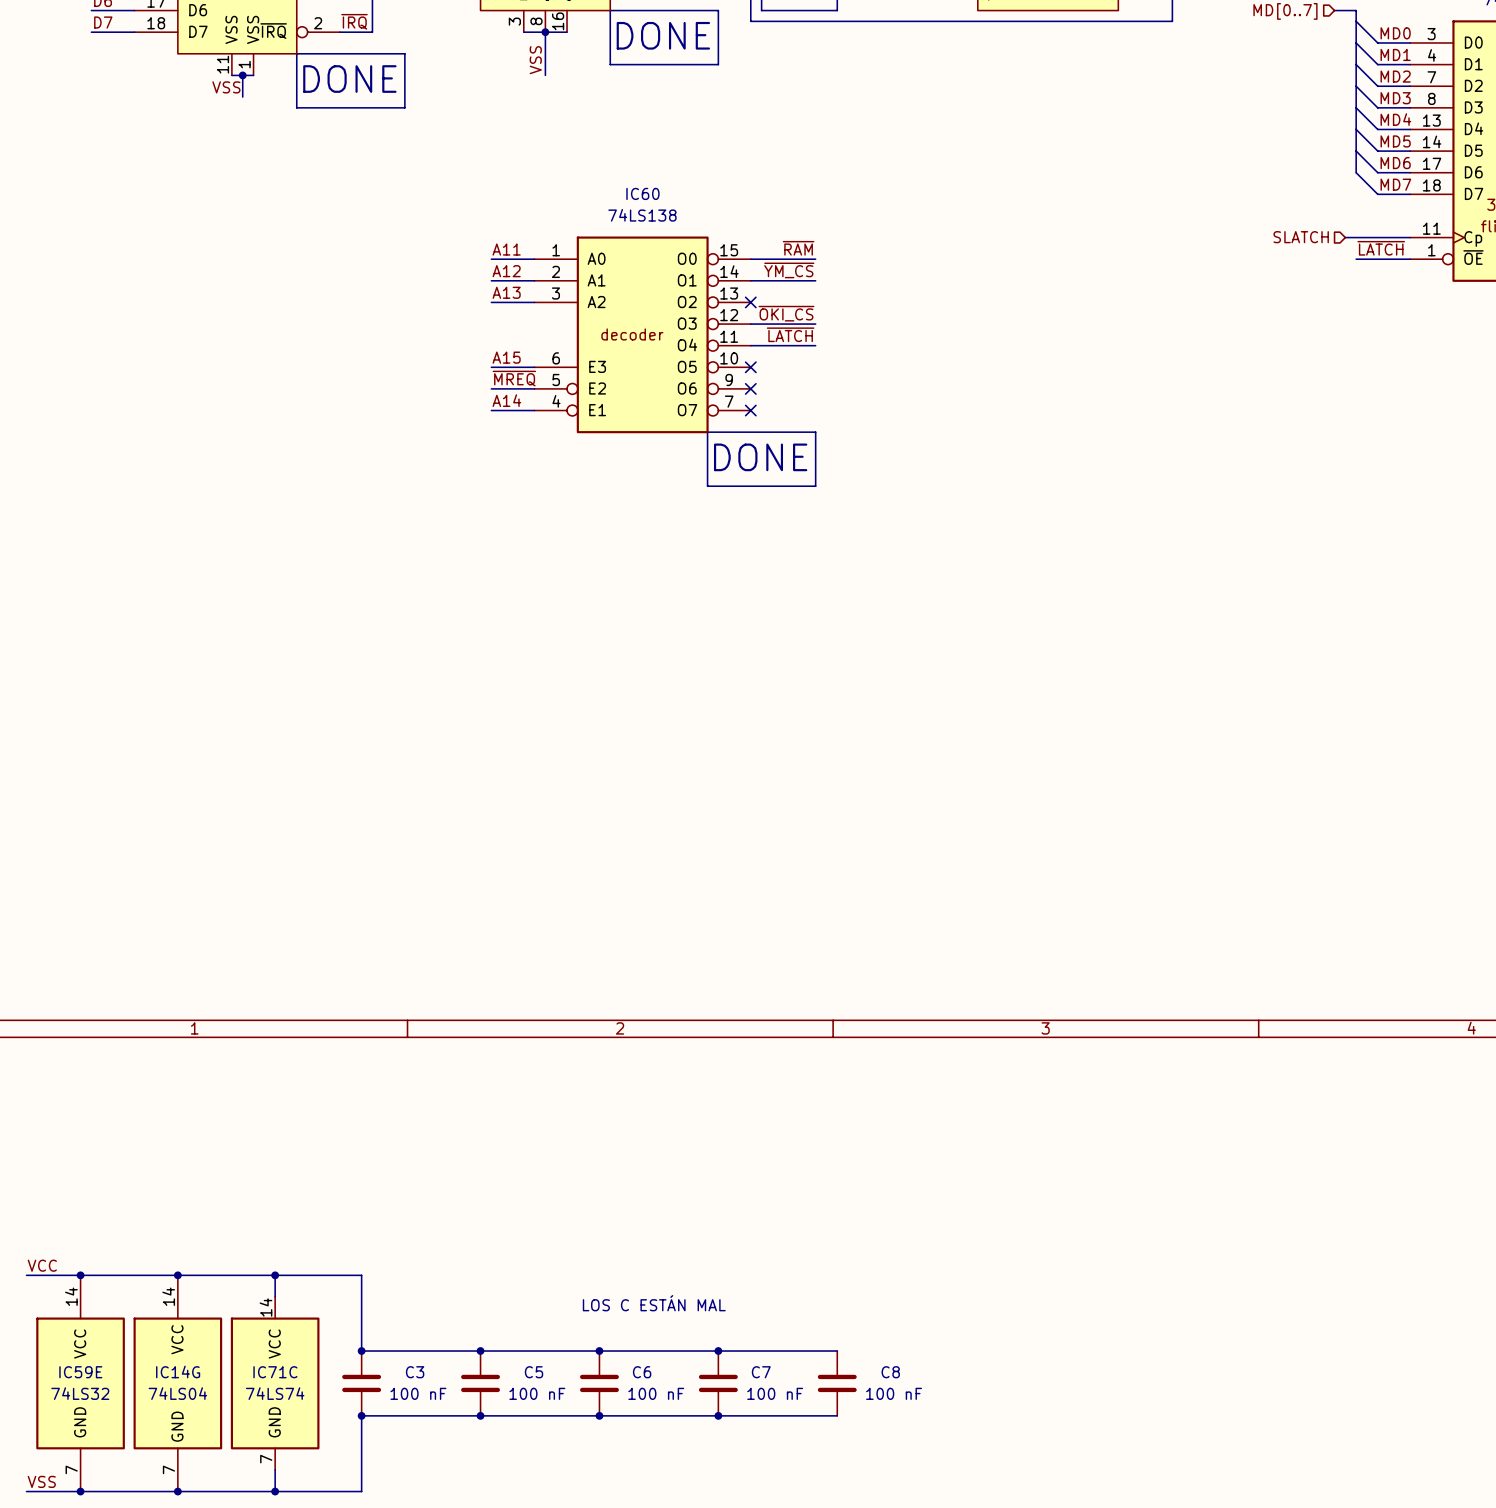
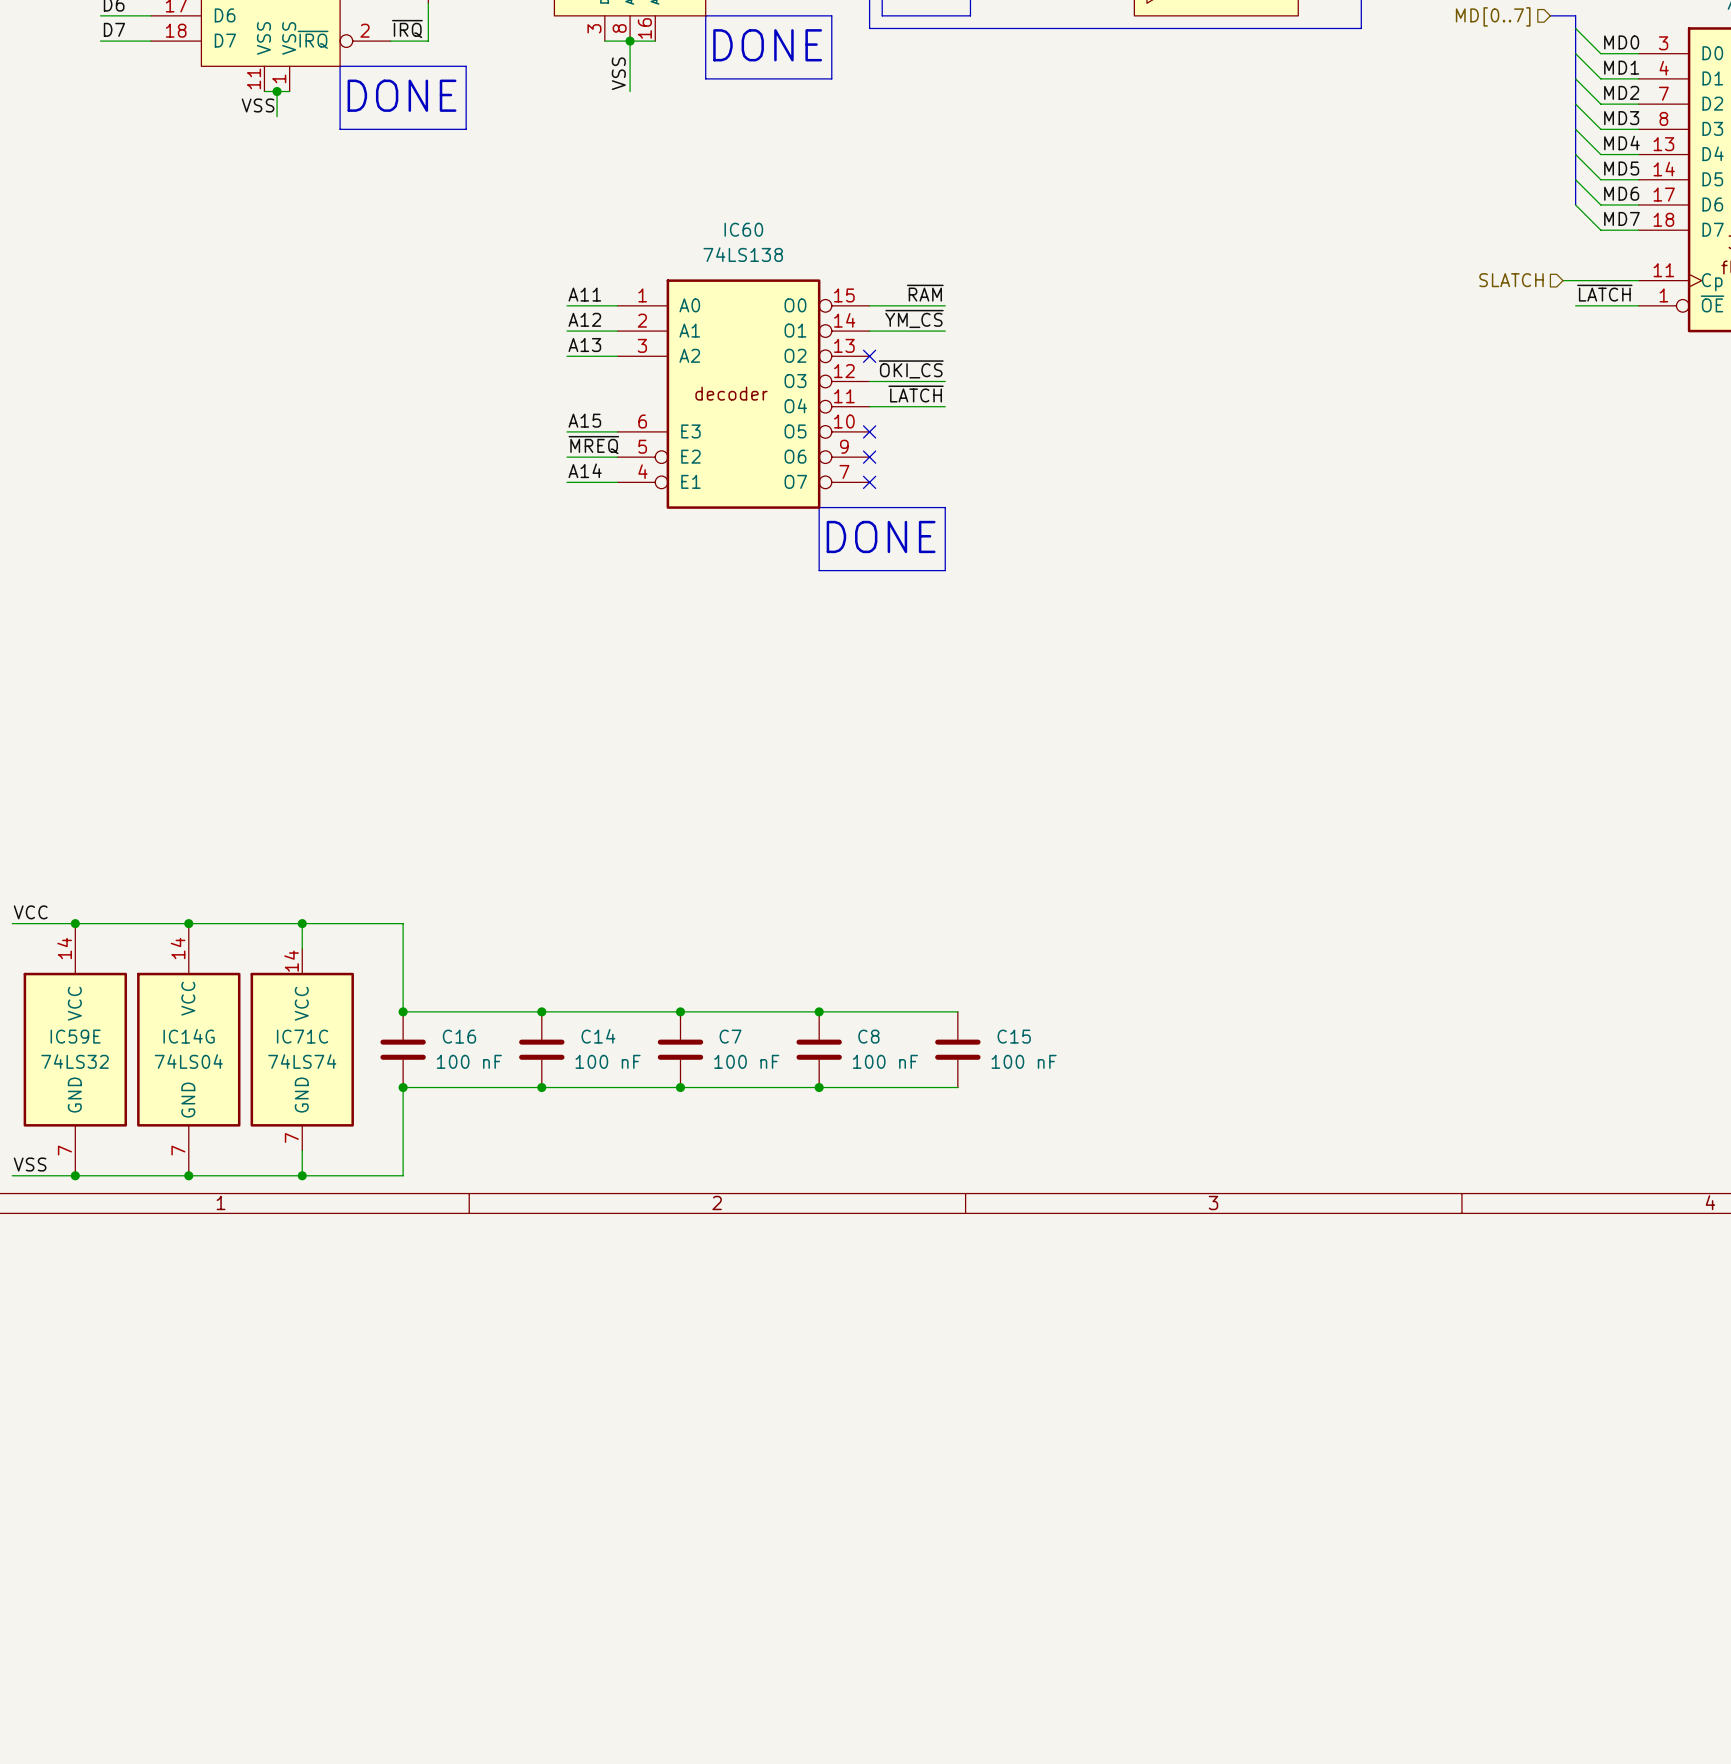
label: none -> VCC (30, 912)
wire: none -> (12, 923) (403, 923) (403, 1011) (957, 1011)
junction: none -> (75, 923)
junction: none -> (188, 923)
wire: none -> (302, 923) (302, 948)
junction: none -> (302, 923)
junction: none -> (403, 1011)
junction: none -> (541, 1011)
junction: none -> (680, 1011)
junction: none -> (819, 1011)
C16: none -> 100 nF (403, 1049)
C14: none -> 100 nF (541, 1049)
C15: none -> 100 nF (957, 1049)
junction: none -> (403, 1087)
junction: none -> (541, 1087)
junction: none -> (680, 1087)
junction: none -> (819, 1087)
wire: none -> (957, 1087) (403, 1087) (403, 1175) (12, 1175)
wire: none -> (302, 1150) (302, 1175)
label: none -> VSS (30, 1164)
junction: none -> (75, 1175)
junction: none -> (188, 1175)
junction: none -> (302, 1175)
label: VCC (42, 1265) -> none
wire: (26, 1275) (361, 1275) (361, 1351) (837, 1351) -> none
junction: (80, 1275) -> none
junction: (177, 1275) -> none
wire: (275, 1275) (275, 1296) -> none
junction: (275, 1275) -> none
text: LOS C ESTÁN MAL (654, 1303) -> none
junction: (361, 1351) -> none
junction: (480, 1351) -> none
junction: (599, 1351) -> none
junction: (718, 1351) -> none
C8 name position: C8 (890, 1372) -> C8 (868, 1036)
IC59E position: (80, 1383) -> (75, 1049)
IC14G position: (177, 1383) -> (188, 1049)
IC71C position: (275, 1383) -> (302, 1049)
C3: 100 nF (361, 1383) -> none
C5: 100 nF (480, 1383) -> none
C6: 100 nF (599, 1383) -> none
C7 position: (718, 1383) -> (680, 1049)
C8 position: (837, 1383) -> (819, 1049)
junction: (361, 1415) -> none
junction: (480, 1415) -> none
junction: (599, 1415) -> none
junction: (718, 1415) -> none
wire: (837, 1415) (361, 1415) (361, 1491) (26, 1491) -> none
wire: (275, 1469) (275, 1491) -> none
label: VSS (41, 1481) -> none
junction: (80, 1491) -> none
junction: (177, 1491) -> none
junction: (275, 1491) -> none

